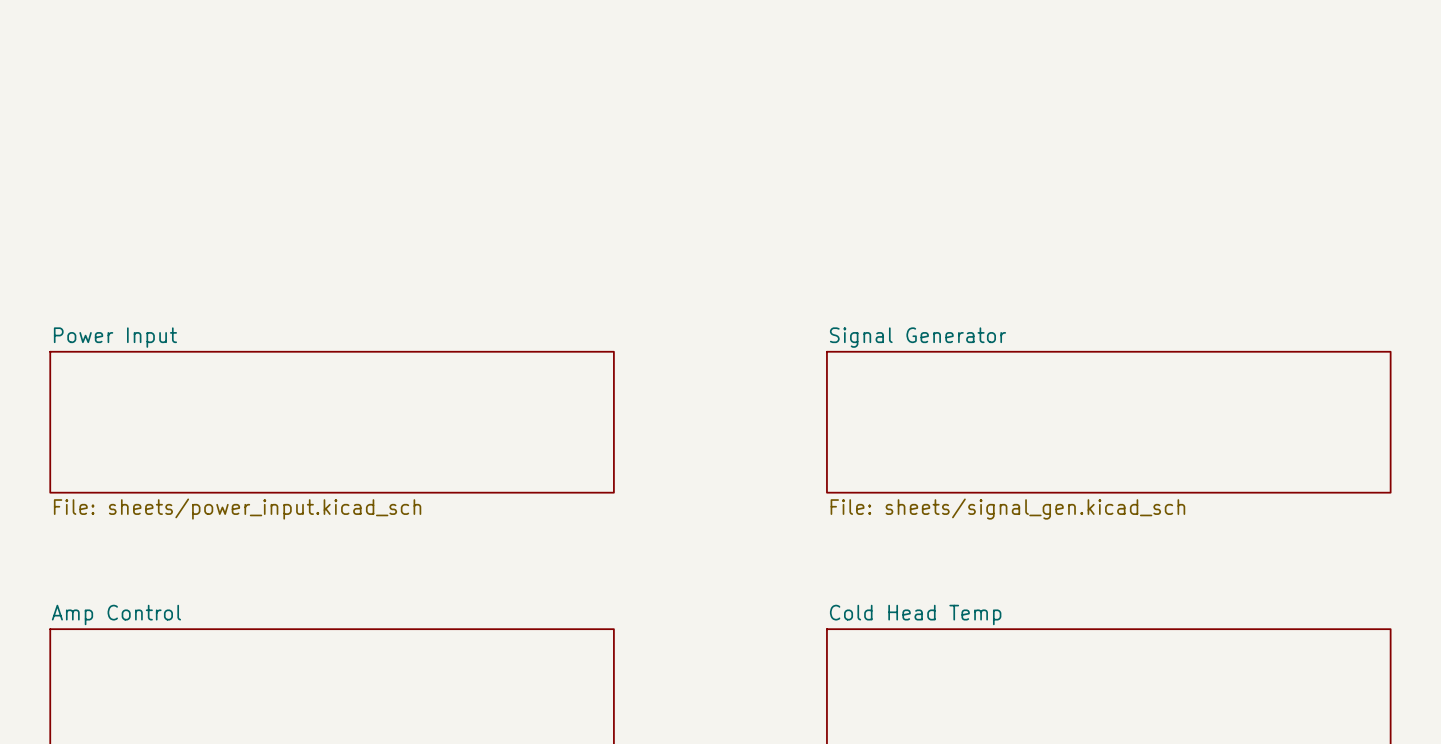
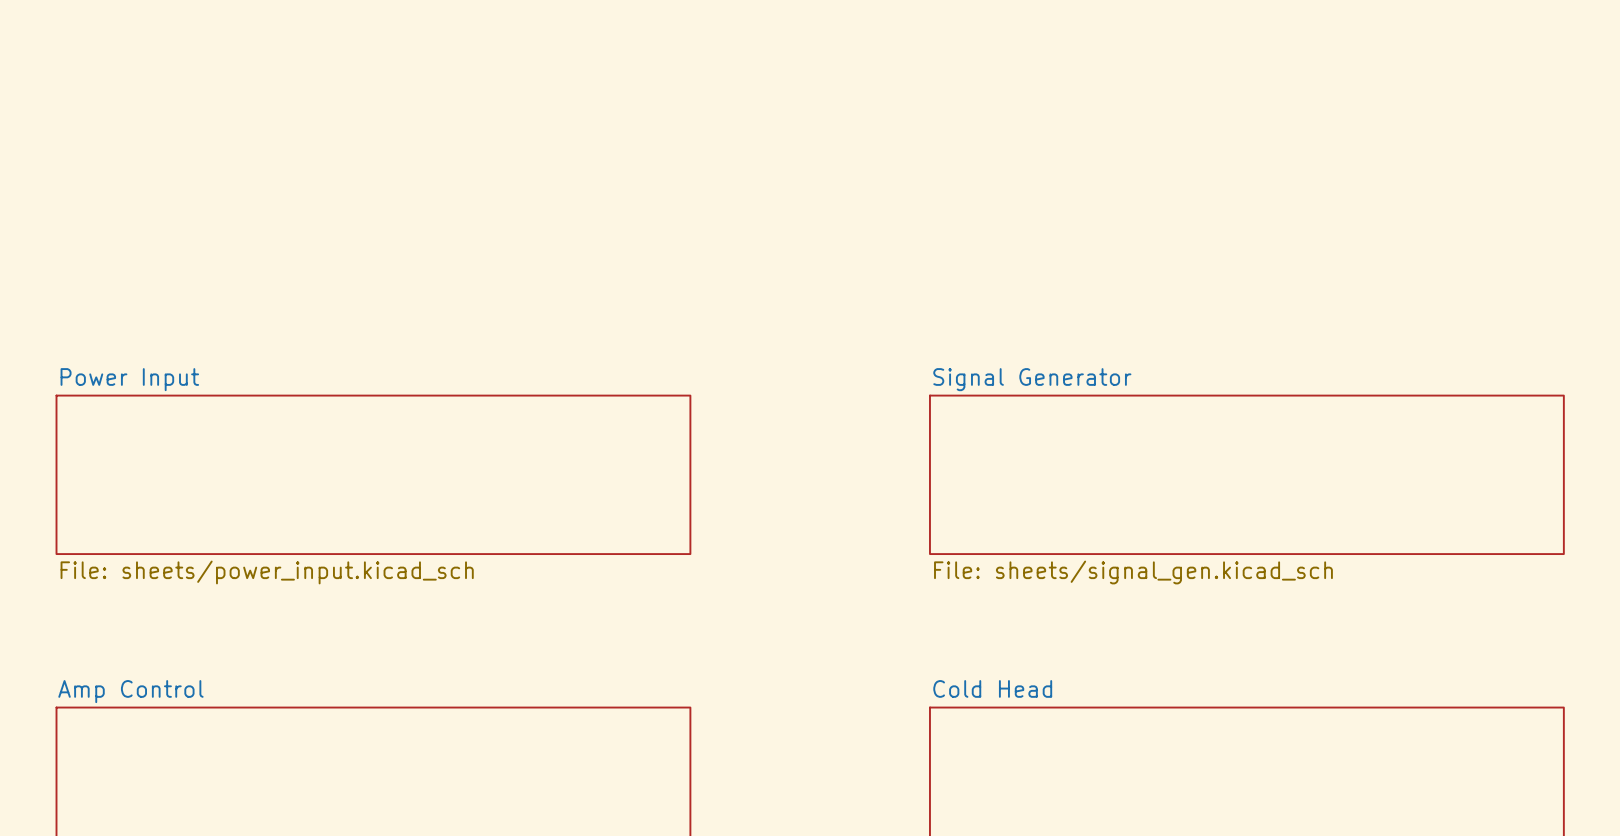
sheet Cold Head Temp name: Cold Head Temp (915, 614) -> Cold Head (992, 688)

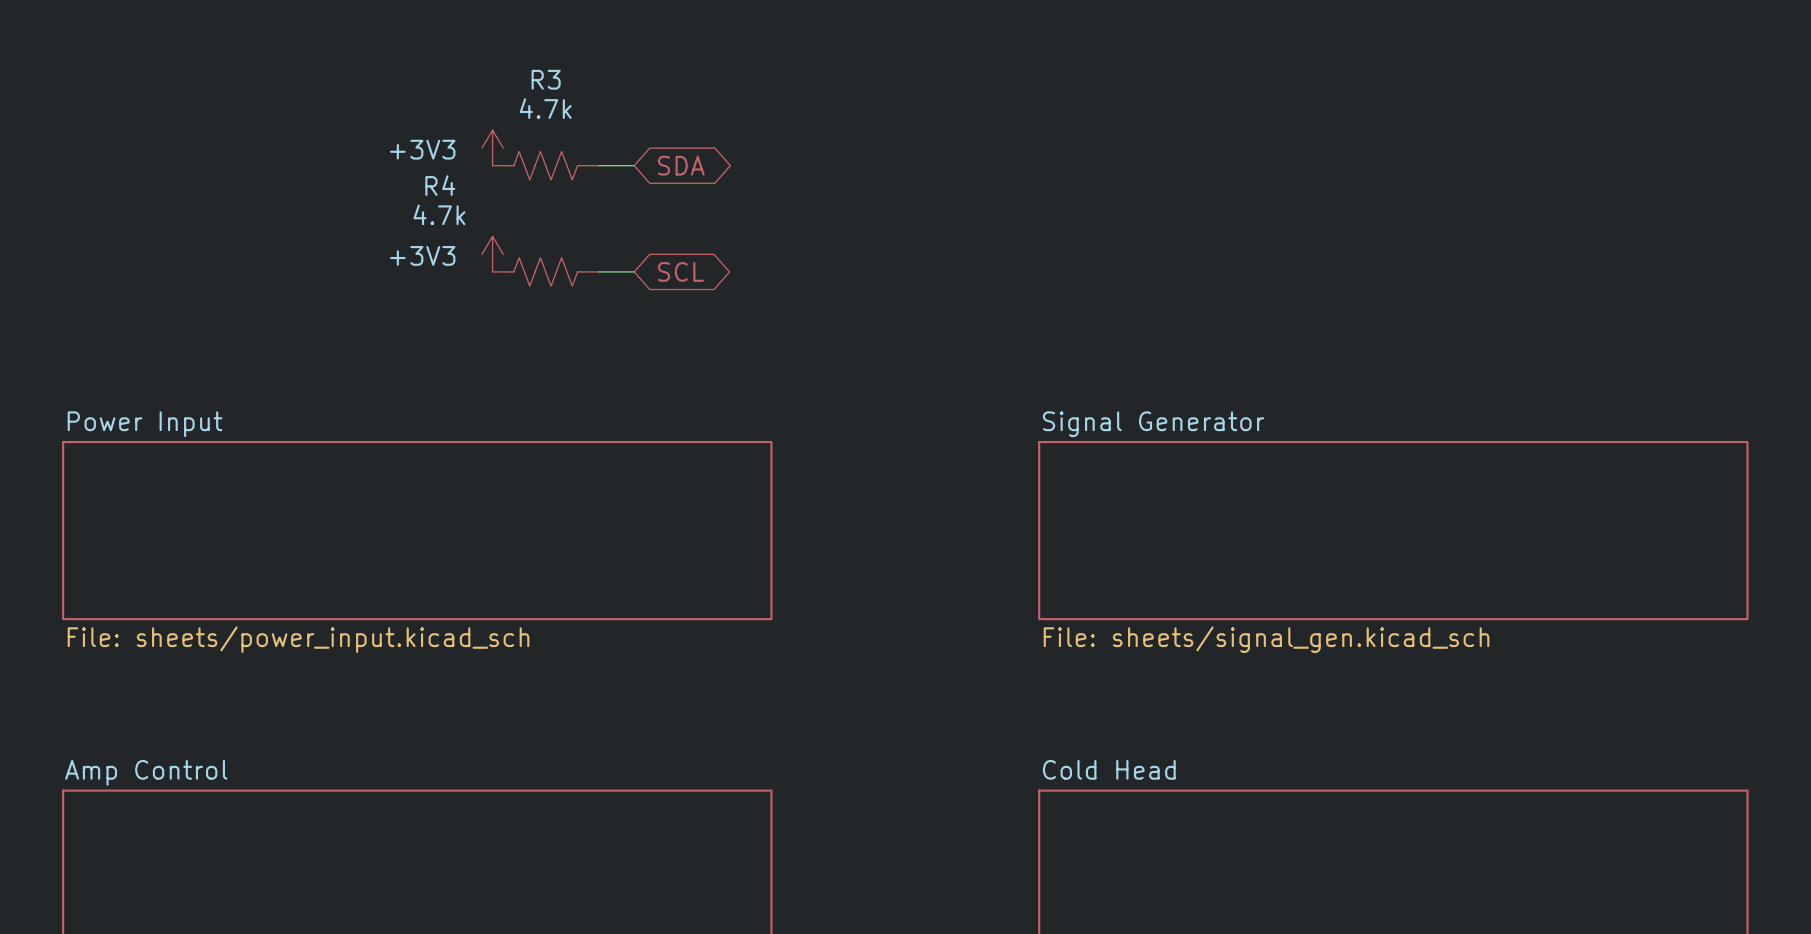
power symbol: none -> +3V3 (492, 147)
R3: none -> 4.7k (545, 165)
wire: none -> (598, 165) (634, 165)
global label: none -> SDA (681, 165)
power symbol: none -> +3V3 (492, 254)
R4: none -> 4.7k (545, 271)
wire: none -> (598, 271) (634, 271)
global label: none -> SCL (680, 271)

